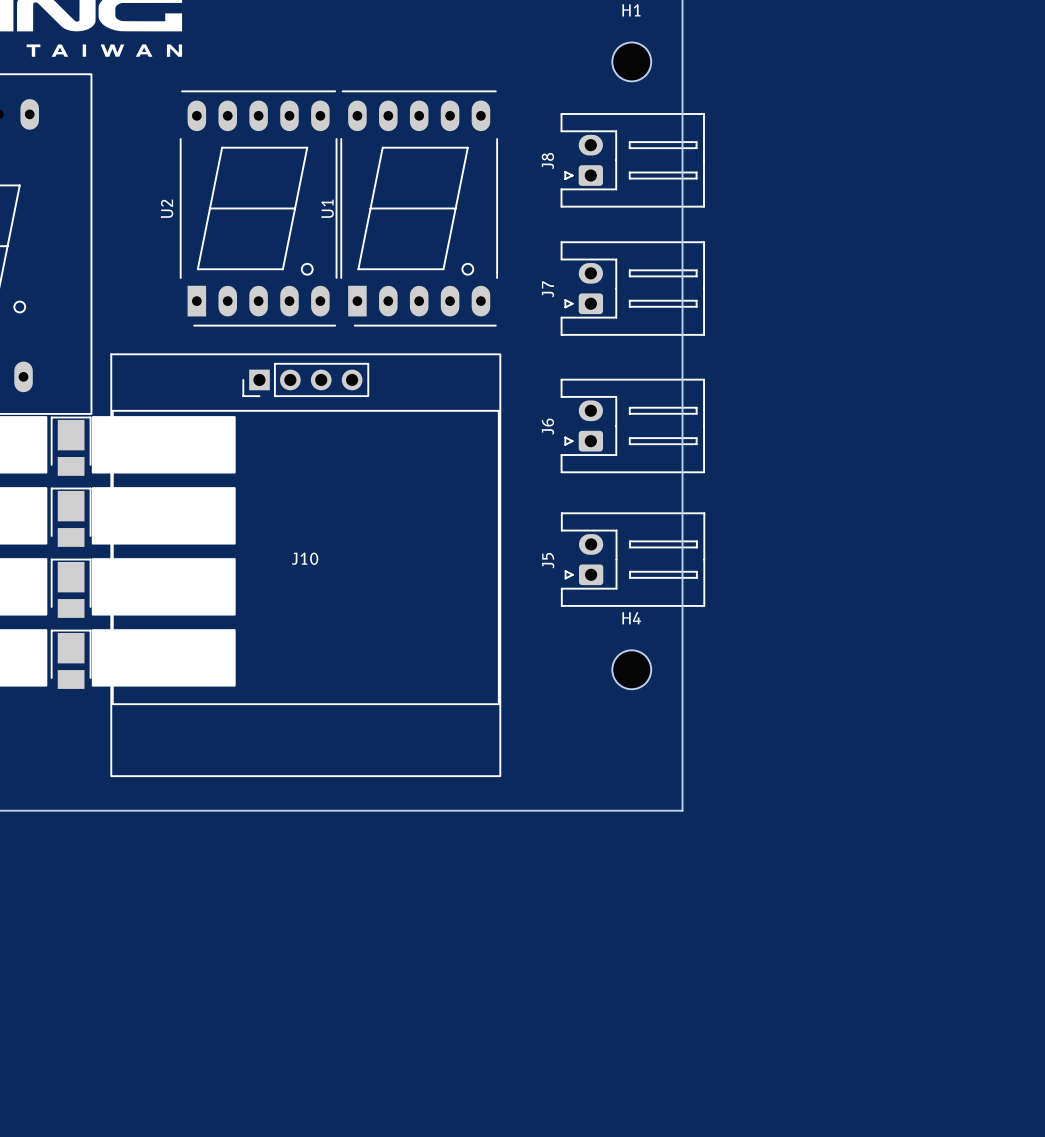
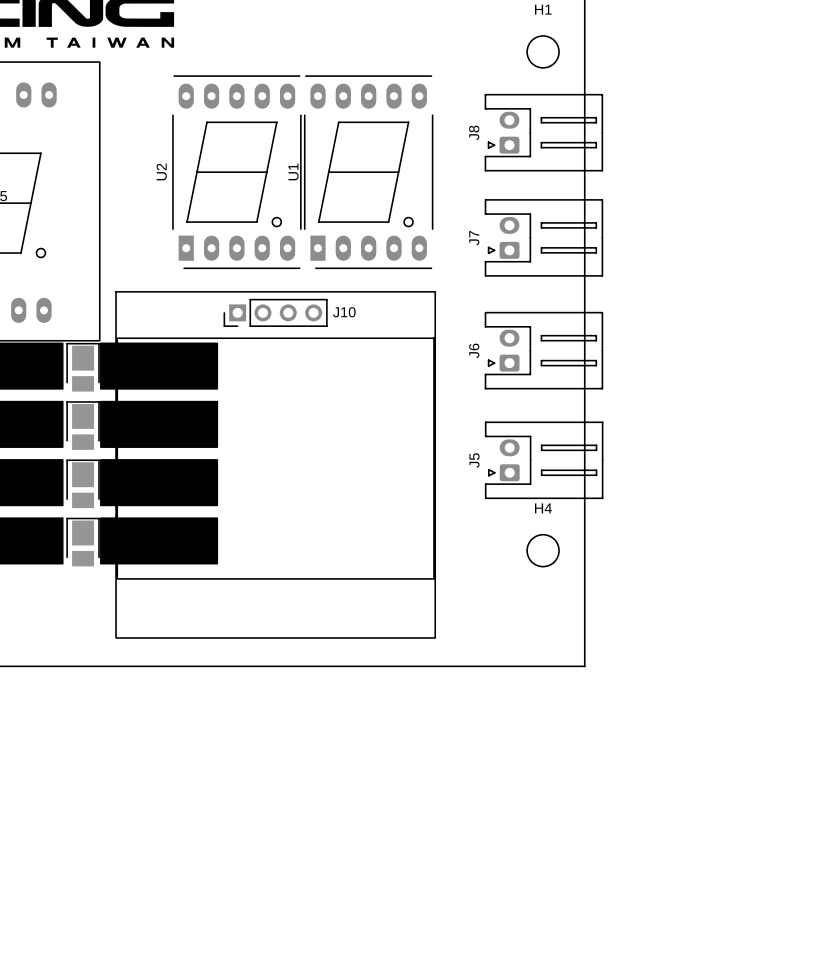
J10 name position: J10 (305, 558) -> J10 (344, 312)

